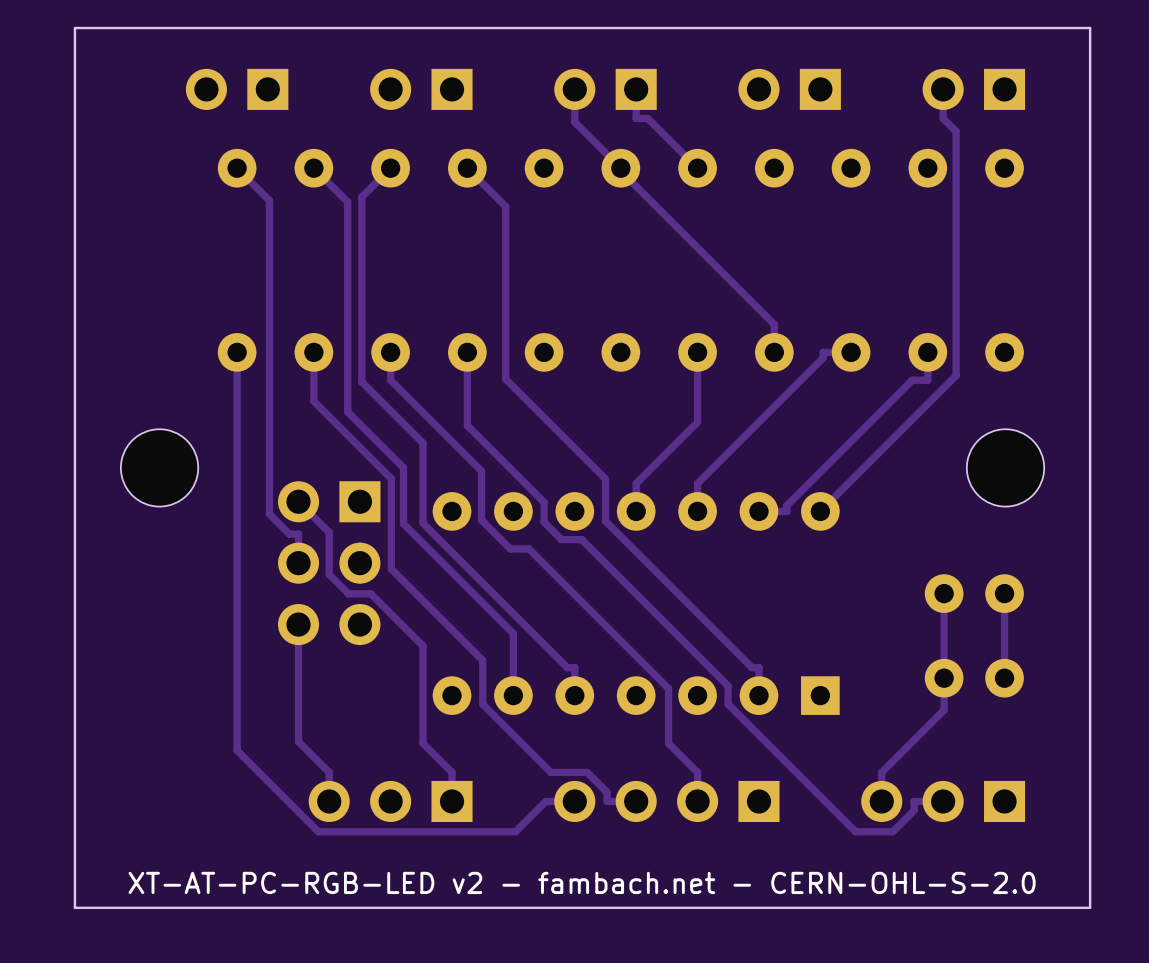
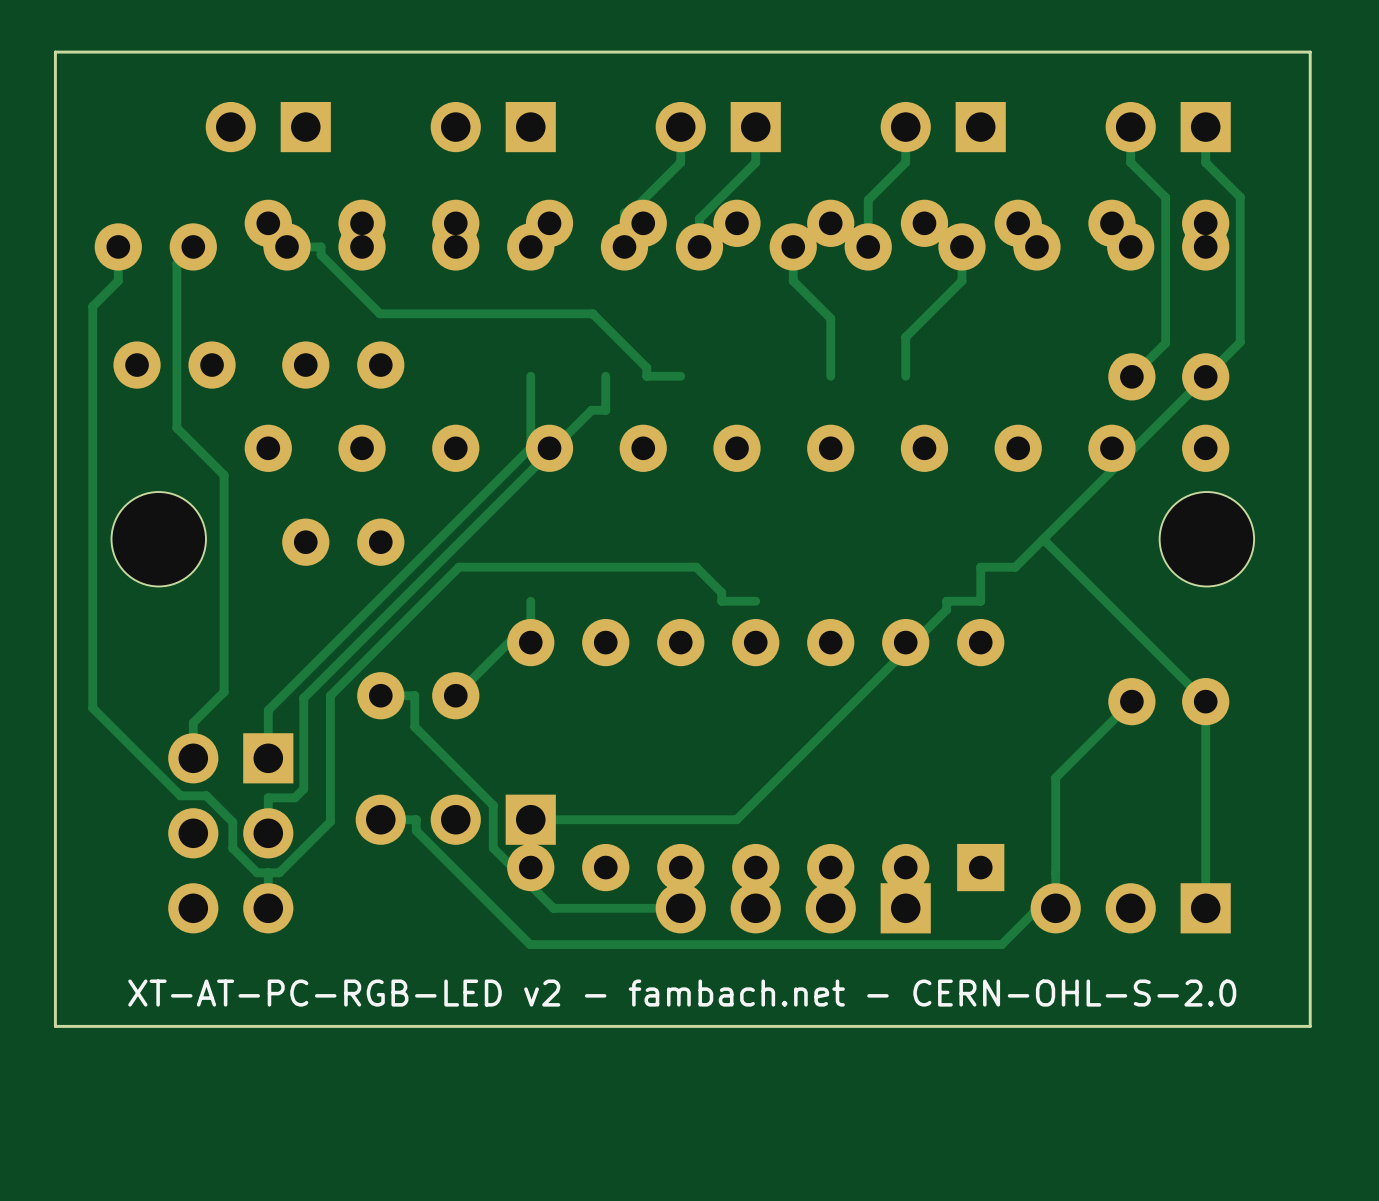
board edge: (74, 28) (74, 907) (1090, 907) (1090, 825) -> (70, 52) (55, 52) (55, 1026) (1310, 1026)
track: none -> (905, 127) (905, 162) (868, 200) (868, 246)
track: none -> (1205, 127) (1205, 162) (1240, 197) (1240, 342) (1015, 567) (980, 567) (980, 601) (946, 601) (946, 609) (736, 819) (530, 819)
track: (574, 118) (574, 122) (620, 168) (620, 171) (774, 324) (774, 352) -> (680, 162) (630, 212) (624, 212) (624, 246)
track: (636, 118) (647, 118) (697, 168) -> (755, 162) (699, 218) (699, 246)
track: (956, 131) (956, 375) (820, 511) -> (1146, 178) (1165, 197) (1165, 343) (1131, 376)
track: (237, 168) (269, 200) (269, 514) (289, 534) (298, 534) (298, 563) -> none
track: (313, 168) (347, 202) (347, 411) (403, 467) (403, 523) (513, 633) (513, 695) -> none
track: (390, 168) (361, 196) (361, 381) (423, 443) (423, 523) (567, 667) (574, 667) (574, 695) -> none
track: (467, 168) (505, 206) (505, 379) (605, 478) (605, 521) (752, 667) (758, 667) (758, 695) -> none
track: none -> (118, 246) (118, 280) (92, 306) (92, 708) (180, 795) (206, 795) (232, 822) (232, 848) (257, 872) (279, 872) (330, 821) (330, 695) (459, 567) (696, 567) (721, 592) (721, 601) (755, 601)
part: none -> (155, 246)
track: none -> (193, 246) (176, 263) (176, 428) (224, 475) (224, 692) (193, 722) (193, 758)
track: none -> (287, 246) (321, 246) (321, 254) (379, 313) (592, 313) (646, 367) (646, 376) (680, 376)
part: none -> (324, 246)
part: none -> (493, 246)
part: none -> (662, 246)
track: none -> (793, 246) (793, 280) (830, 318) (830, 376)
part: none -> (830, 246)
track: none -> (961, 246) (961, 280) (905, 337) (905, 376)
part: none -> (999, 246)
part: none -> (1168, 246)
part: none -> (174, 365)
part: none -> (343, 365)
part: none -> (1168, 376)
track: (237, 352) (237, 566) -> (530, 376) (530, 447) (268, 710)
track: (313, 352) (313, 401) (391, 478) (391, 569) (482, 660) (482, 704) (550, 772) (587, 772) (607, 792) (607, 801) (636, 801) -> none
track: (390, 352) (390, 380) (481, 471) (481, 520) (510, 549) (528, 549) (668, 688) (668, 743) (697, 772) (697, 801) -> none
track: (467, 352) (467, 425) (544, 502) (544, 522) (561, 539) (581, 539) (728, 685) (728, 704) (855, 831) (892, 831) (914, 810) (914, 801) (943, 801) -> none
track: (697, 352) (697, 422) (636, 483) (636, 511) -> none
track: (851, 352) (823, 352) (823, 357) (697, 483) (697, 511) -> none
track: (927, 352) (927, 380) (912, 380) (786, 505) (786, 511) (758, 511) -> none
track: none -> (1043, 539) (1205, 701) (1205, 742)
part: none -> (343, 542)
part position: (159, 467) -> (158, 539)
part position: (1005, 467) -> (1206, 539)
track: none -> (530, 601) (530, 635) (516, 635) (455, 695)
track: (298, 501) (329, 532) (329, 574) (348, 593) (370, 593) (422, 645) (422, 743) (452, 772) (452, 801) -> none
track: none -> (380, 695) (414, 695) (414, 726) (493, 805) (493, 848) (553, 908) (680, 908)
part: none -> (418, 695)
track: none -> (1131, 701) (1055, 777) (1055, 908)
part position: (329, 563) -> (230, 833)
track: (944, 593) (944, 710) (881, 772) (881, 801) -> none
part position: (974, 593) -> (1168, 701)
track: (237, 606) (237, 638) -> (605, 376) (605, 410) (591, 410) (303, 698) (303, 788) (294, 797) (268, 797)
track: (298, 624) (298, 741) (329, 772) (329, 801) -> none
track: none -> (380, 819) (416, 819) (416, 830) (530, 944) (1001, 944) (1055, 890)
track: (237, 667) (237, 699) -> none
part: (974, 678) -> none
track: none -> (1205, 846) (1205, 908)
track: (237, 728) (237, 750) (318, 831) (515, 831) (545, 801) (574, 801) -> none
part position: (390, 801) -> (455, 819)
part position: (666, 801) -> (793, 908)
part position: (943, 801) -> (1130, 908)
text position: XT-AT-PC-RGB-LED v2 - fambach.net - CERN-OHL-S-2.0 (582, 882) -> XT-AT-PC-RGB-LED v2 - fambach.net - CERN-OHL-S-2.0 (682, 993)

